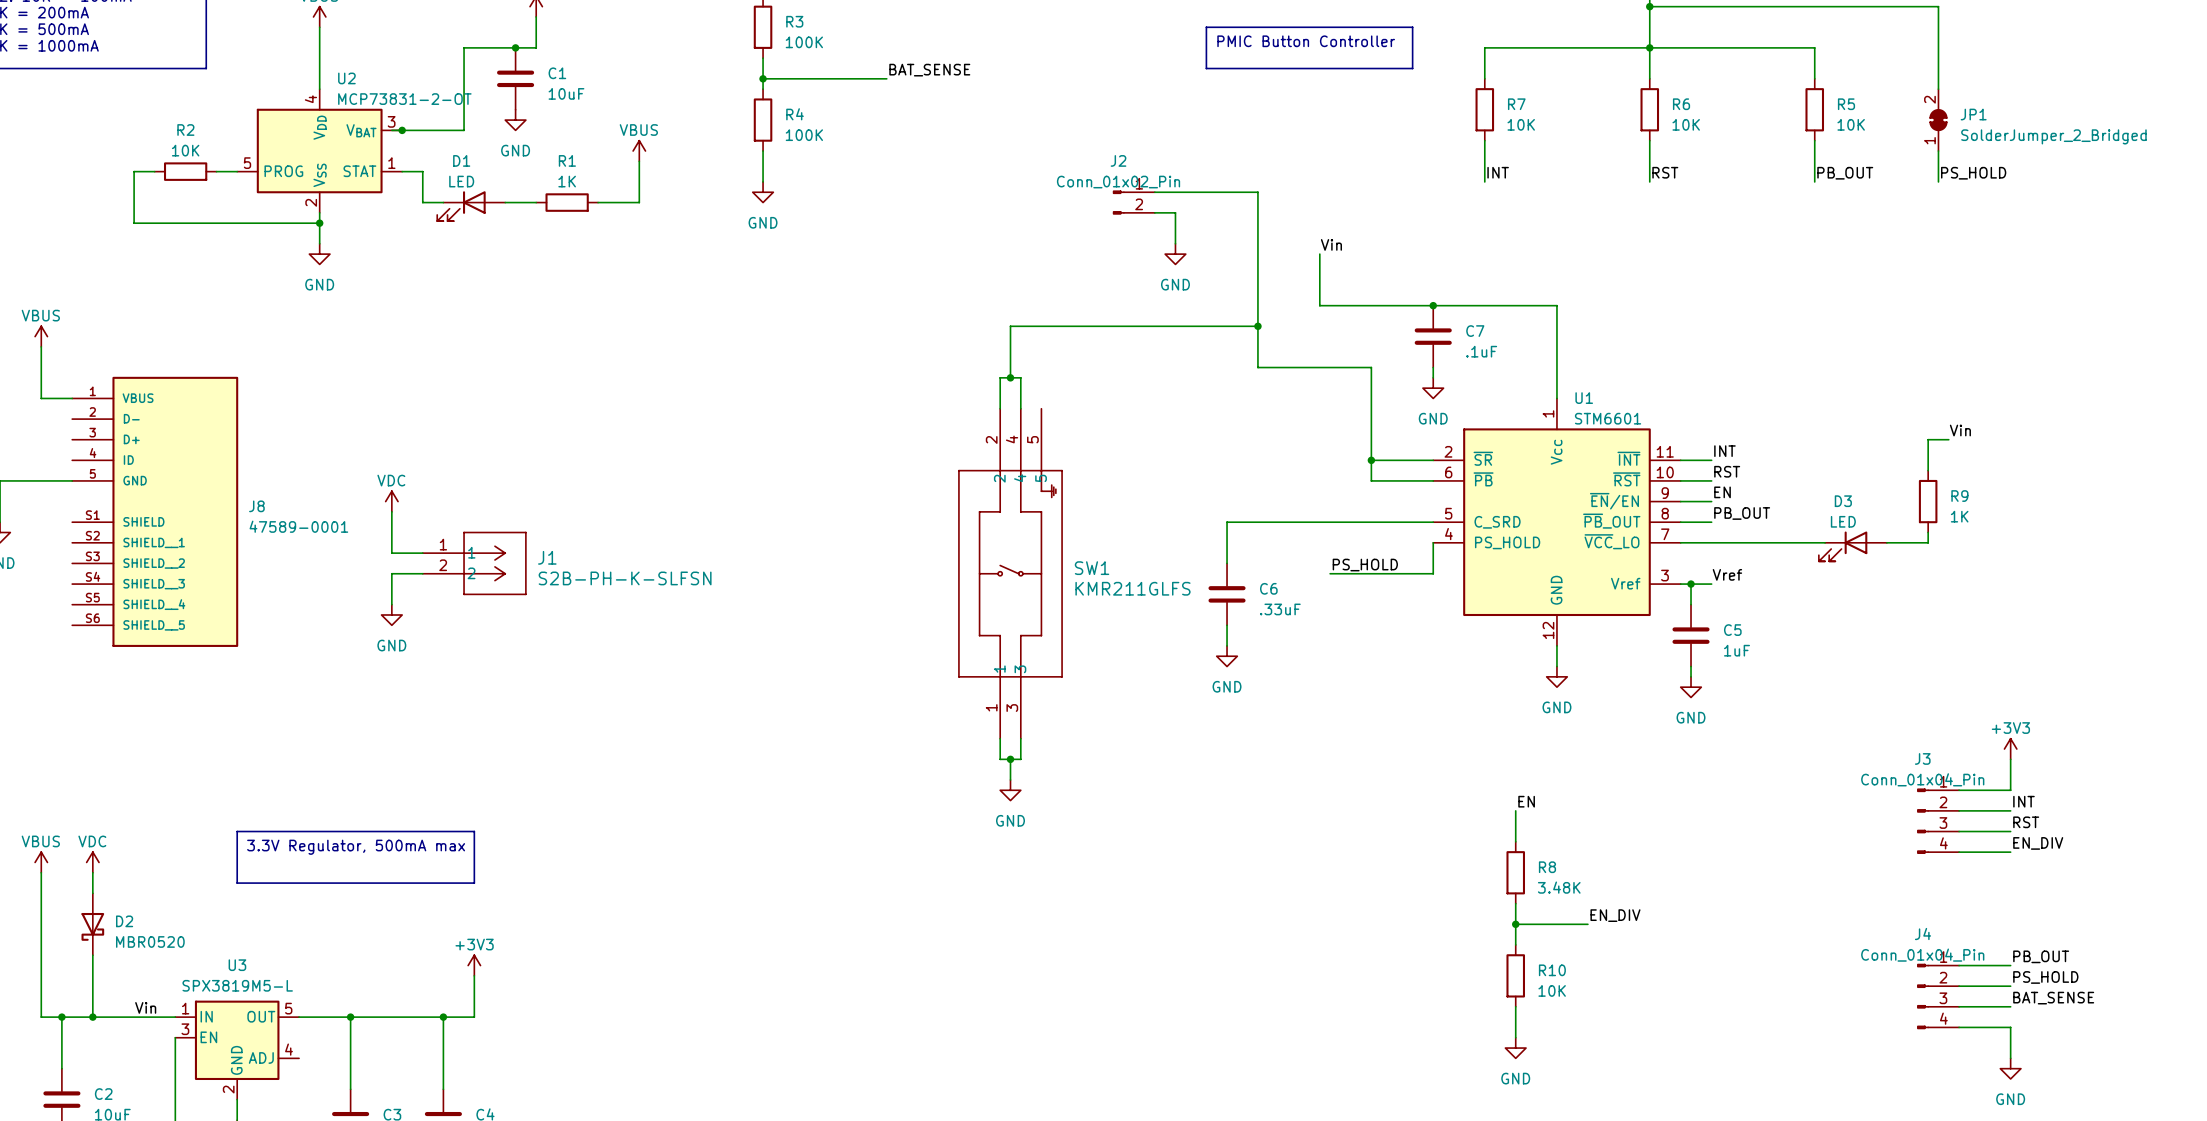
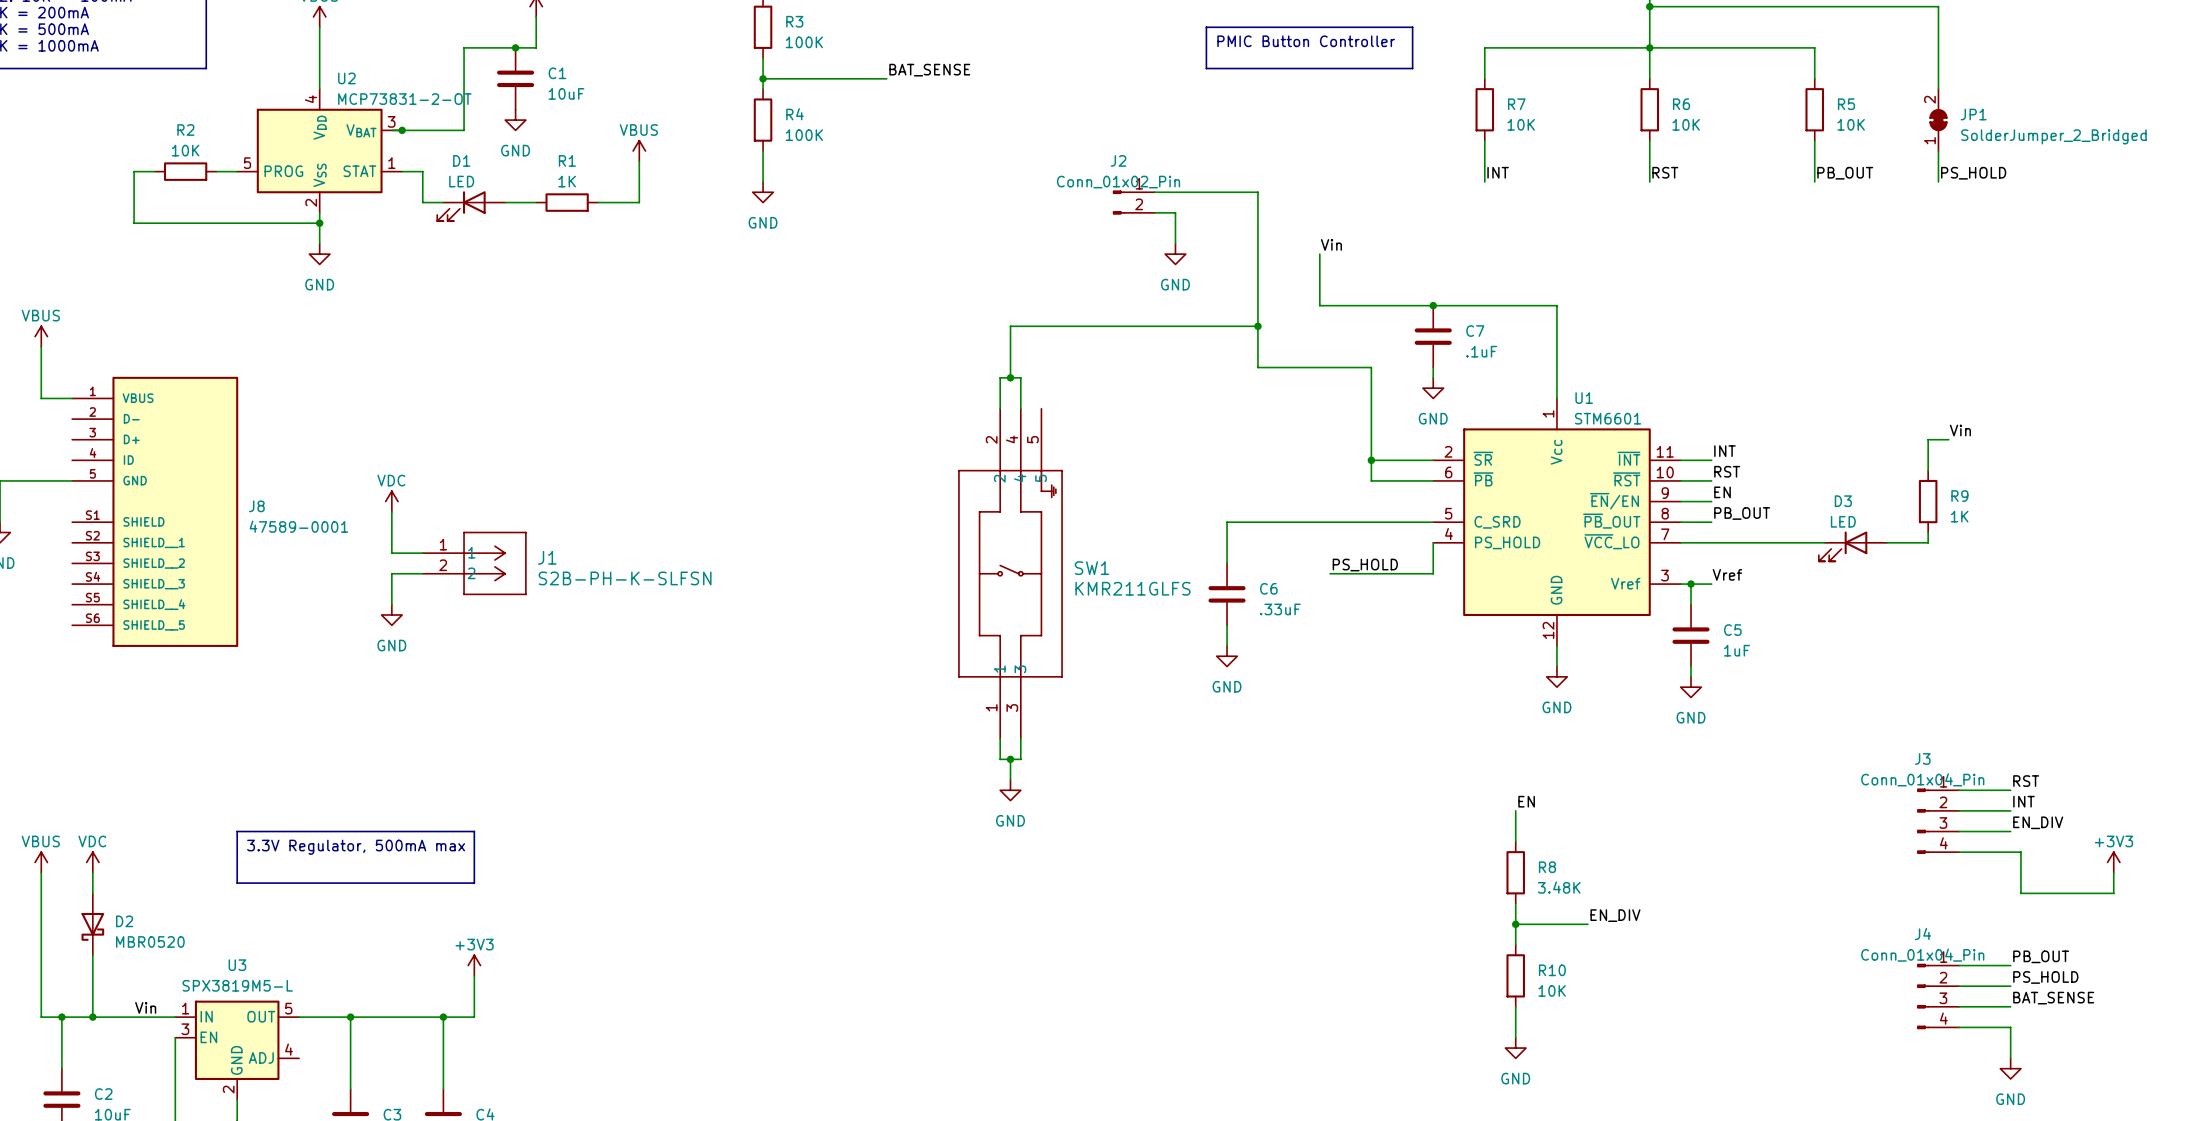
power symbol position: +3V3 (2010, 749) -> +3V3 (2113, 862)
wire: (2010, 759) (2010, 790) -> none
label: none -> RST (2026, 781)
label: RST (2026, 822) -> EN_DIV (2038, 822)
label: EN_DIV (2038, 843) -> none
wire: none -> (2010, 852) (2020, 852) (2020, 893) (2113, 893) (2113, 872)

